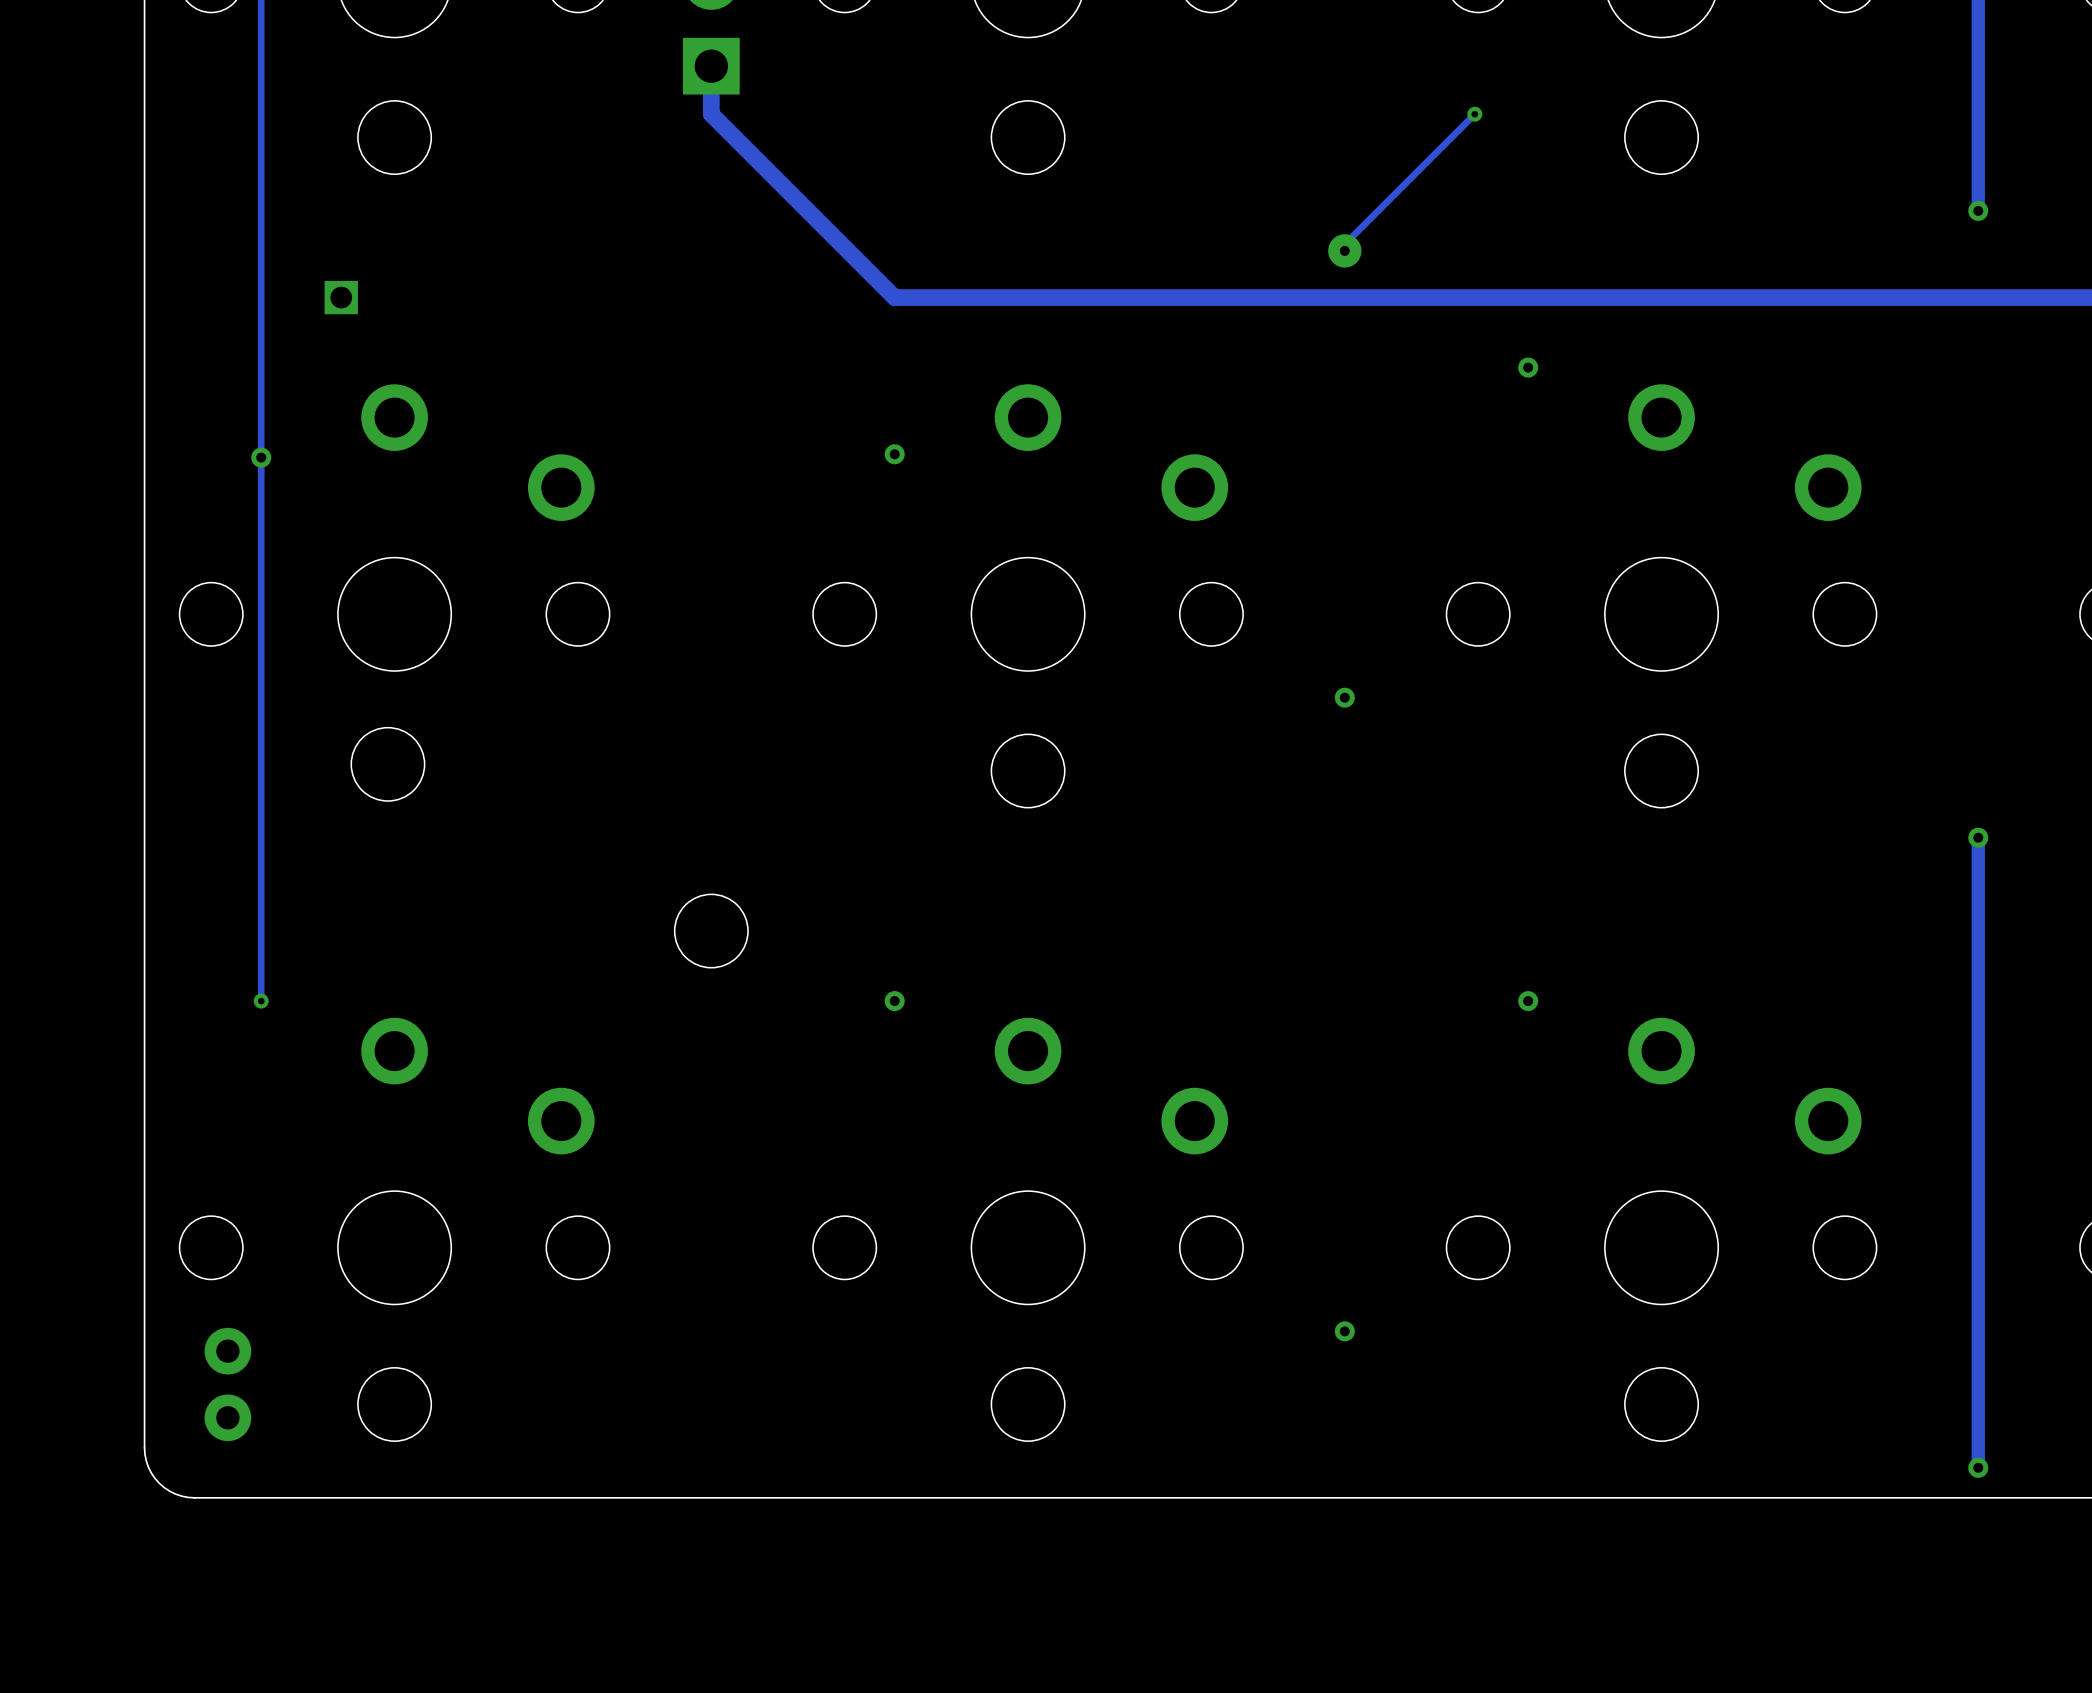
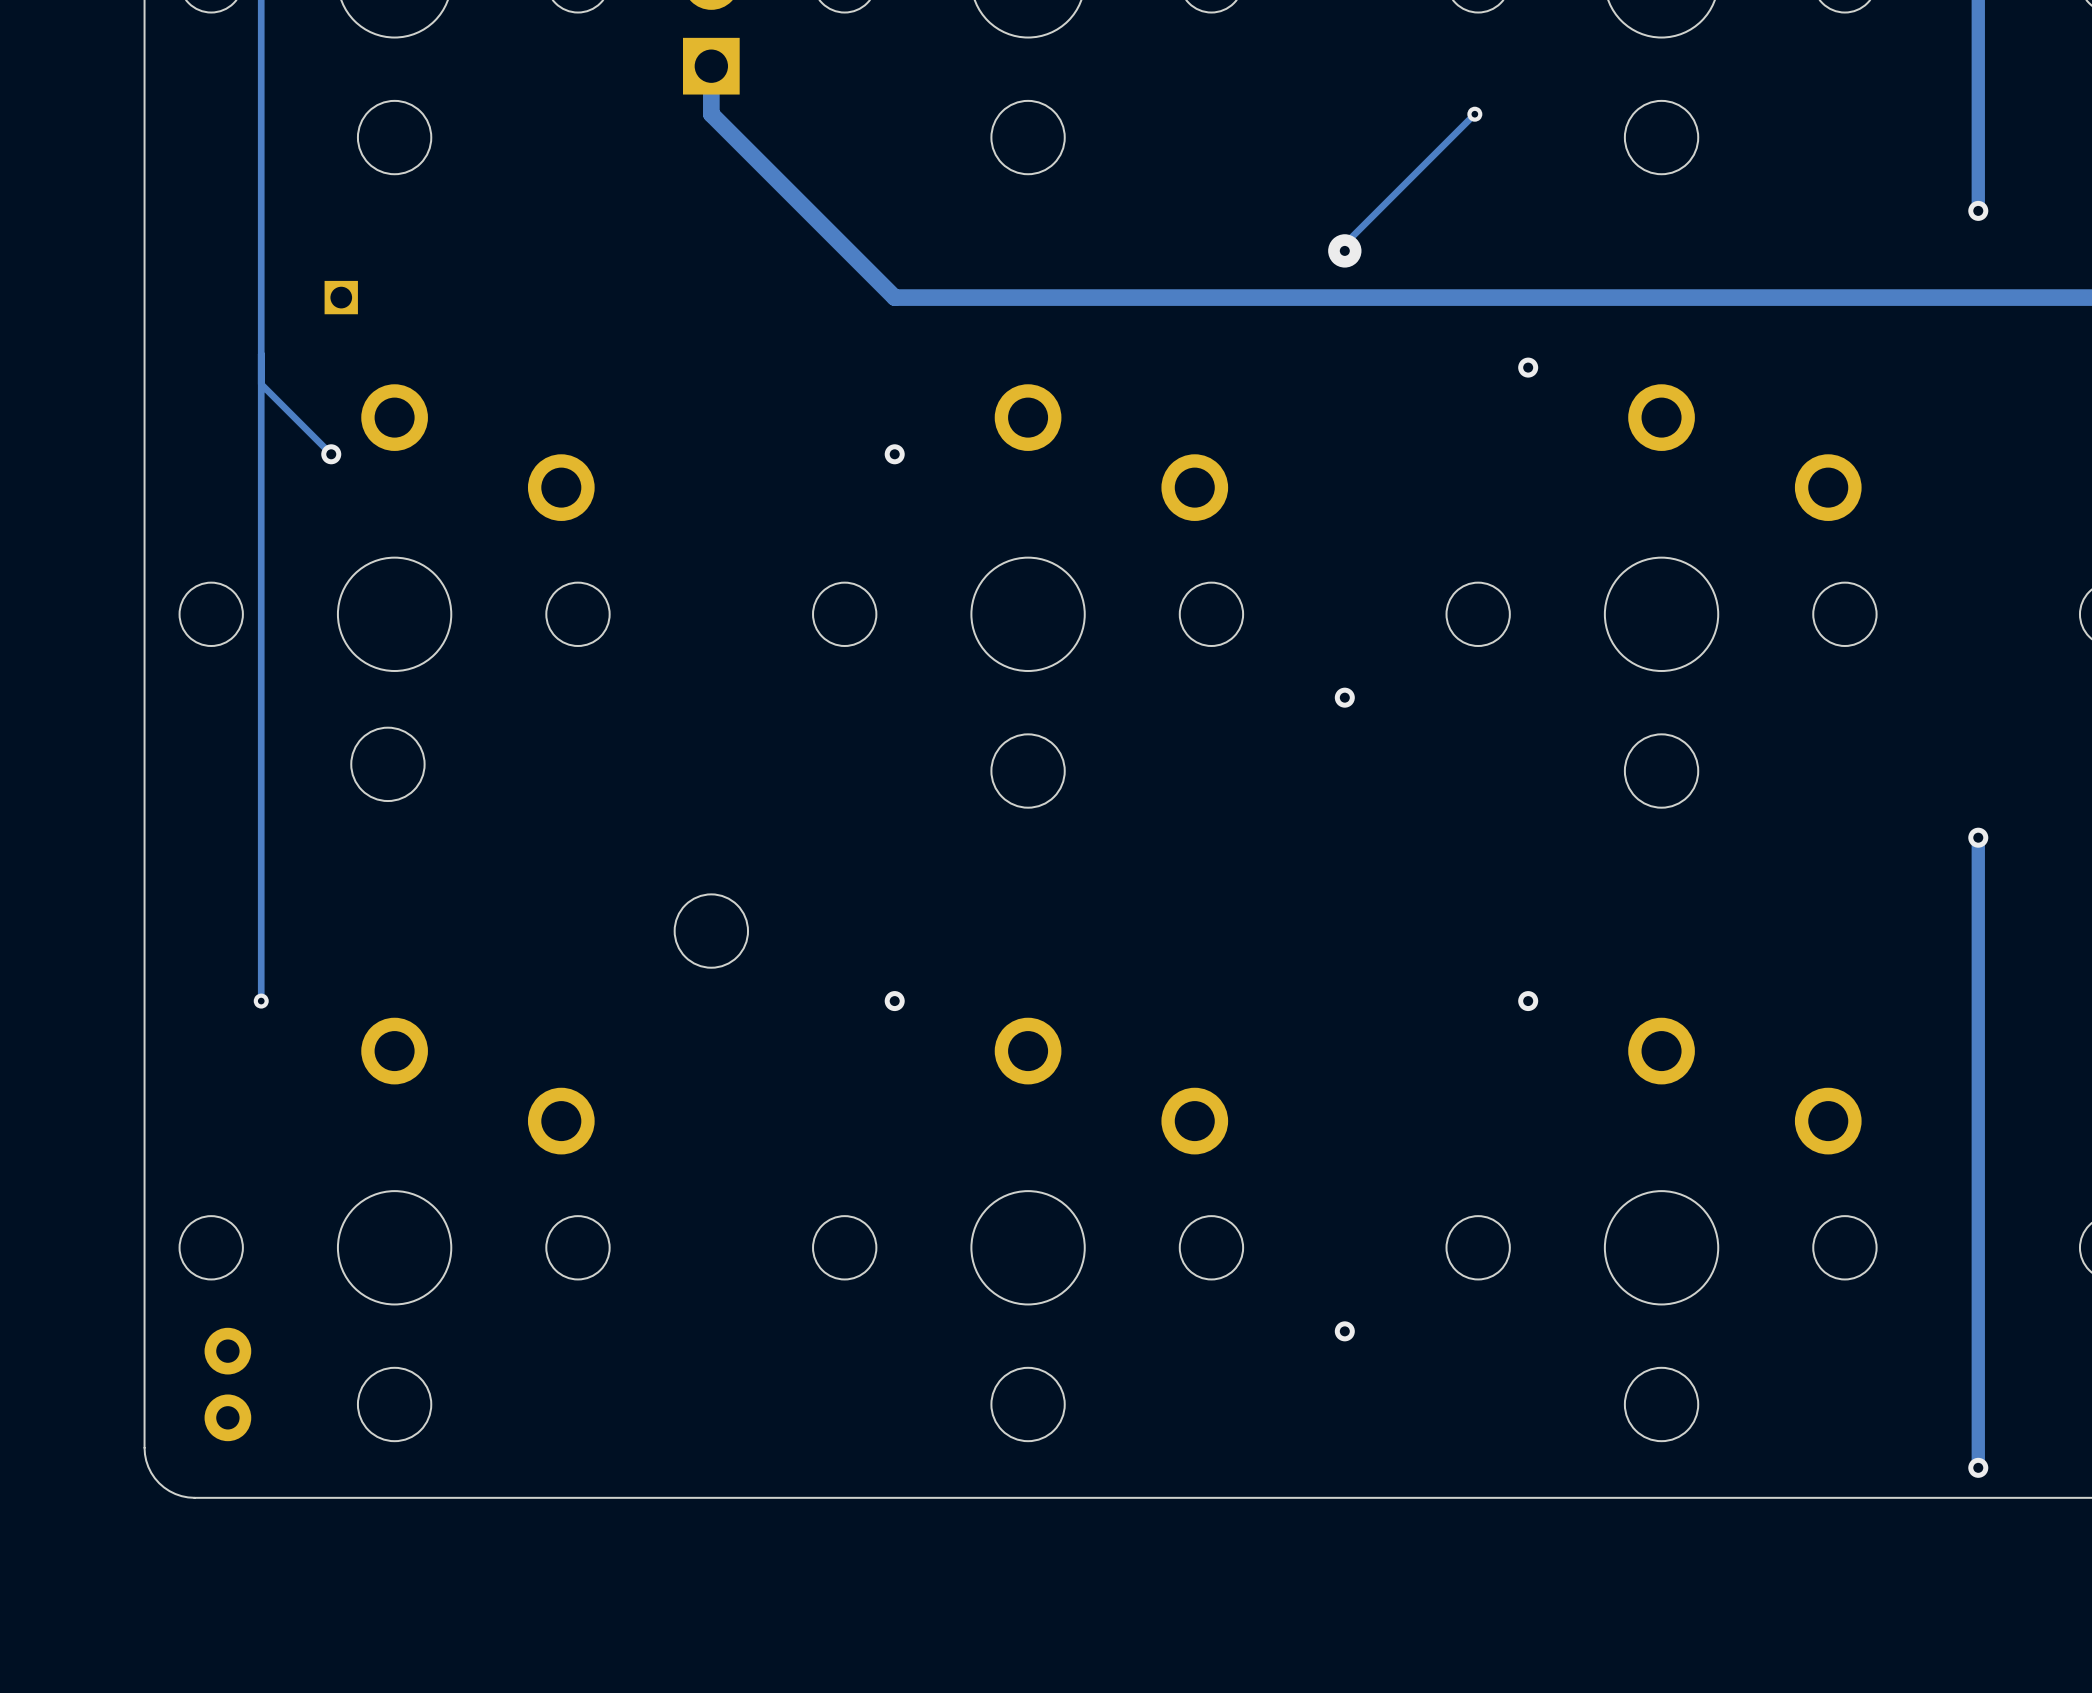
track: none -> (261, 384) (331, 454)
via position: (261, 457) -> (331, 454)

